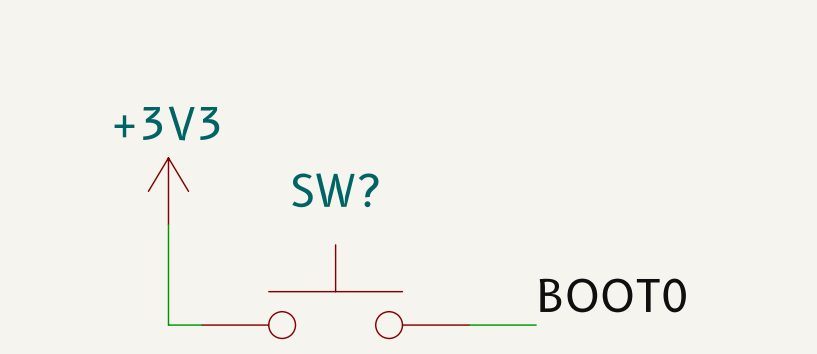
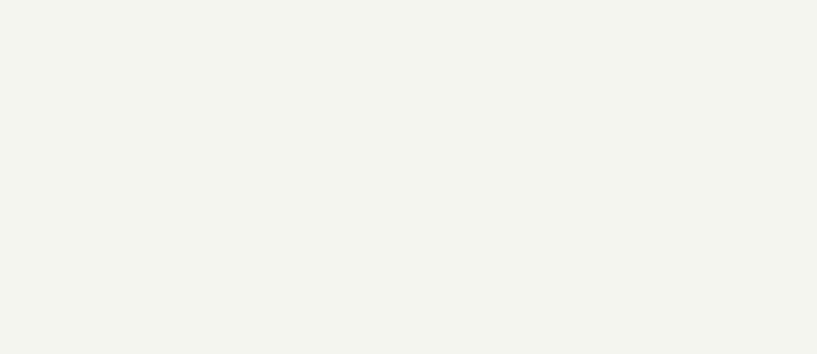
power symbol: +3V3 (168, 191) -> none
wire: (168, 224) (168, 325) (201, 325) -> none
SW?: (335, 291) -> none
label: BOOT0 (612, 295) -> none
wire: (469, 325) (536, 325) -> none

